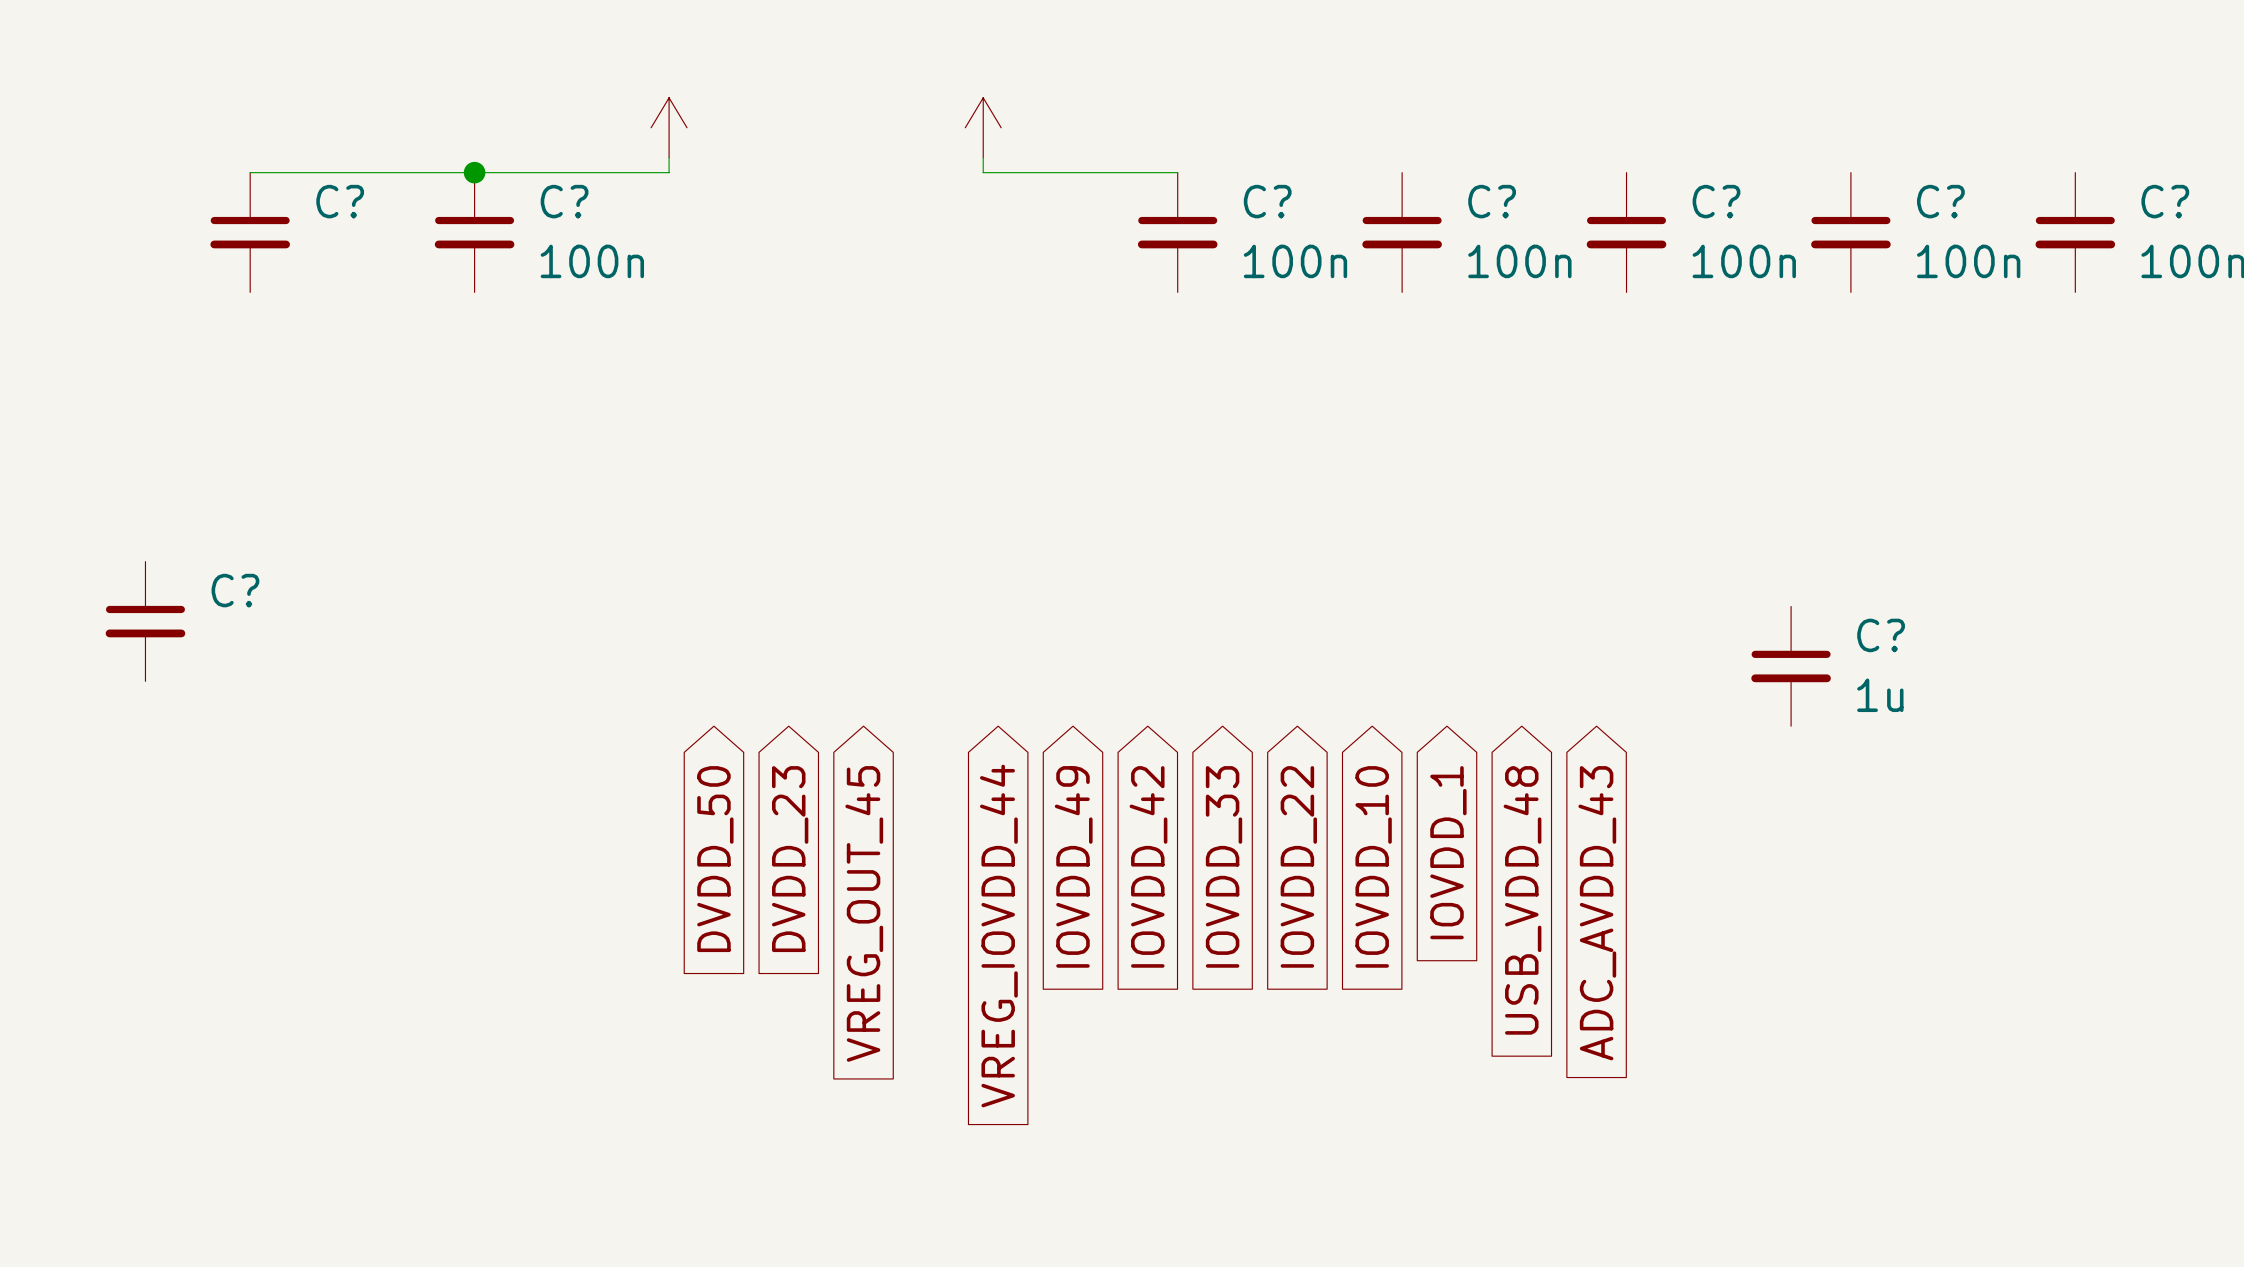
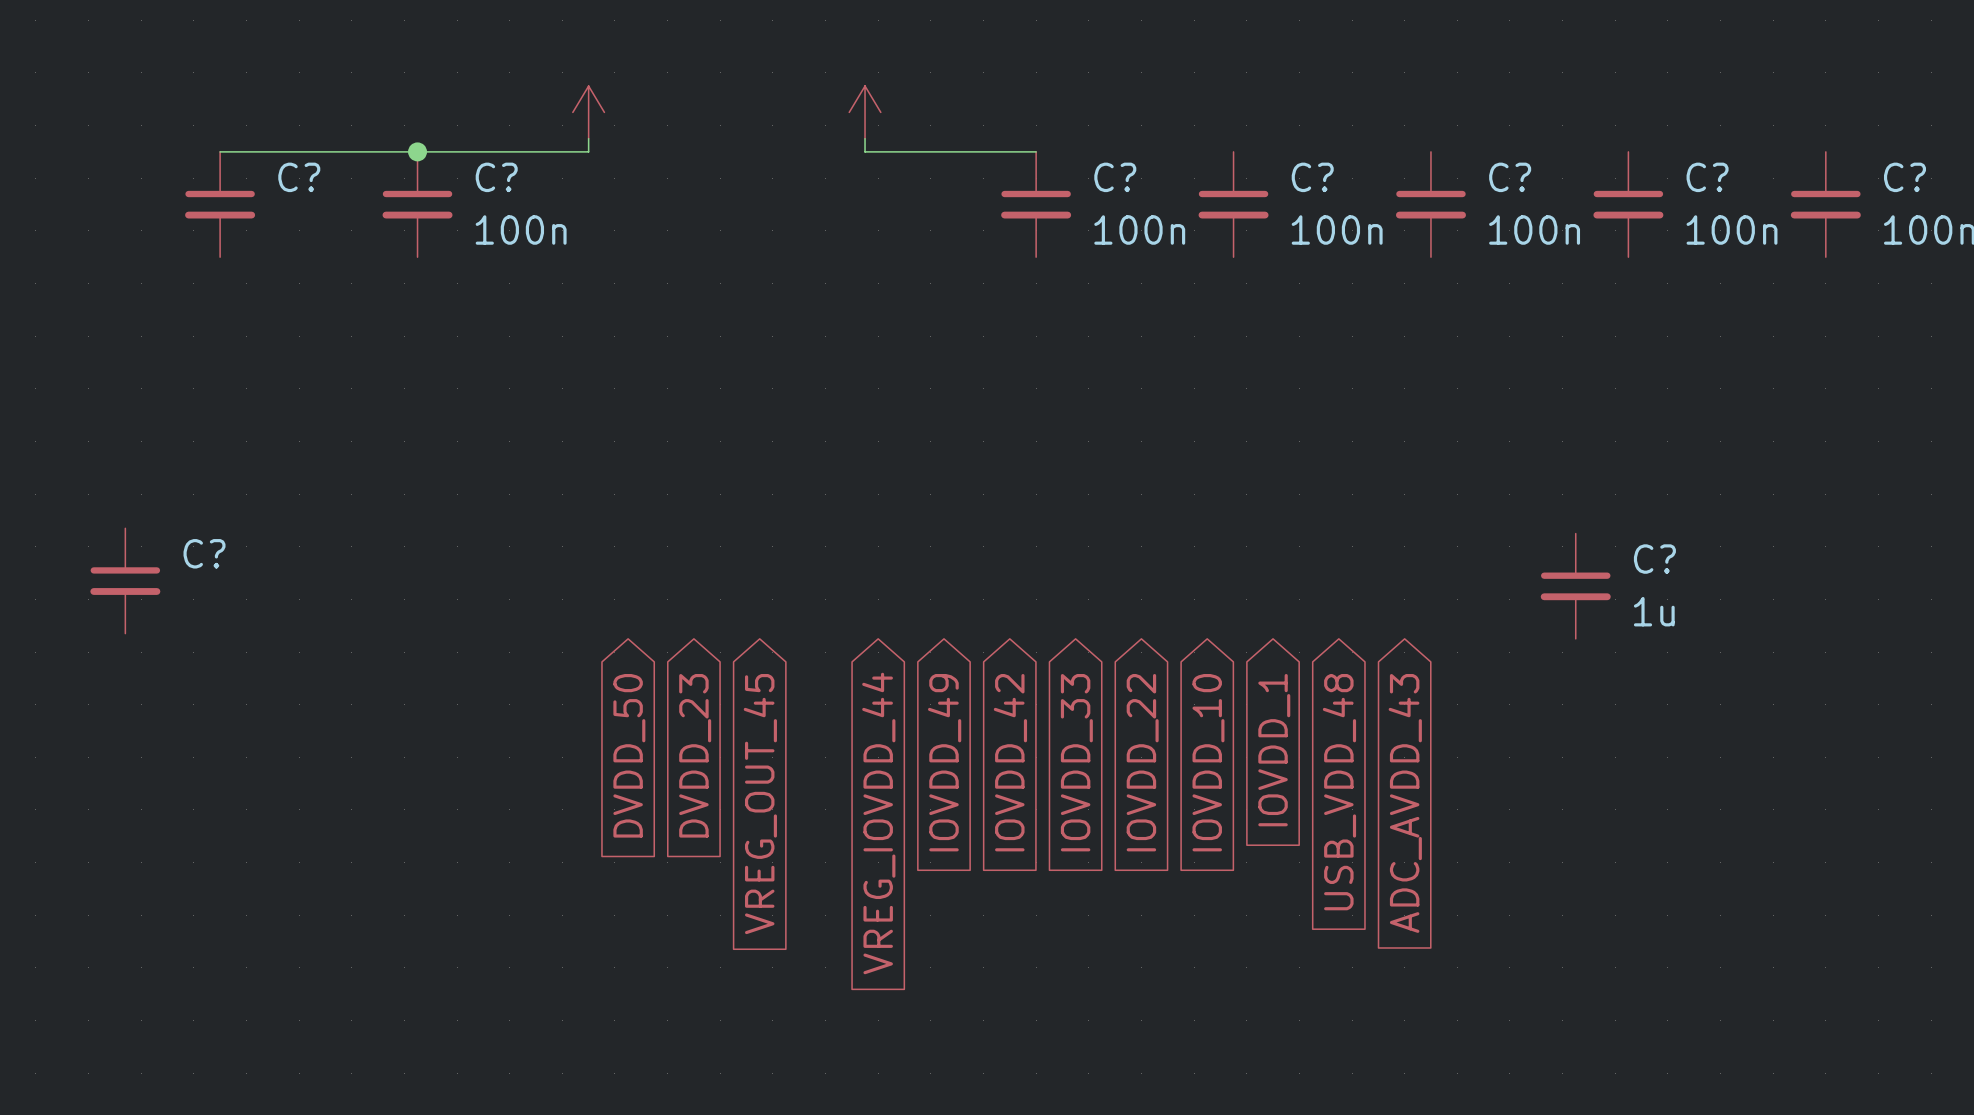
C? position: (145, 621) -> (125, 580)

